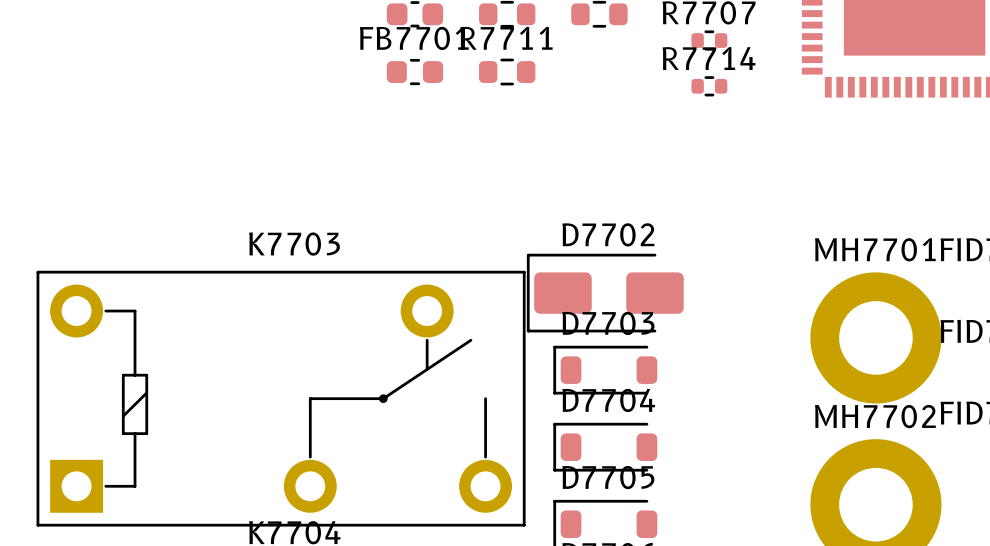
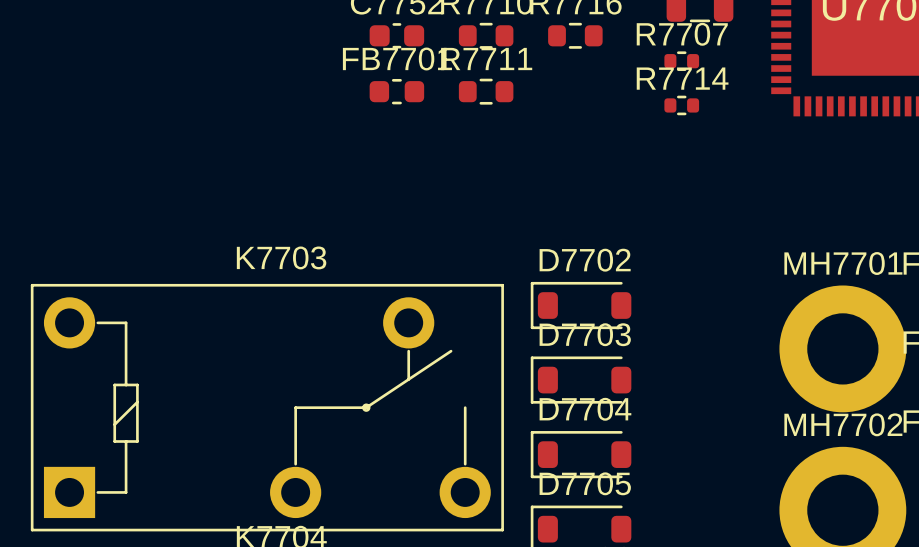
D7702 footprint: [526, 253, 684, 333] -> [530, 281, 632, 330]

